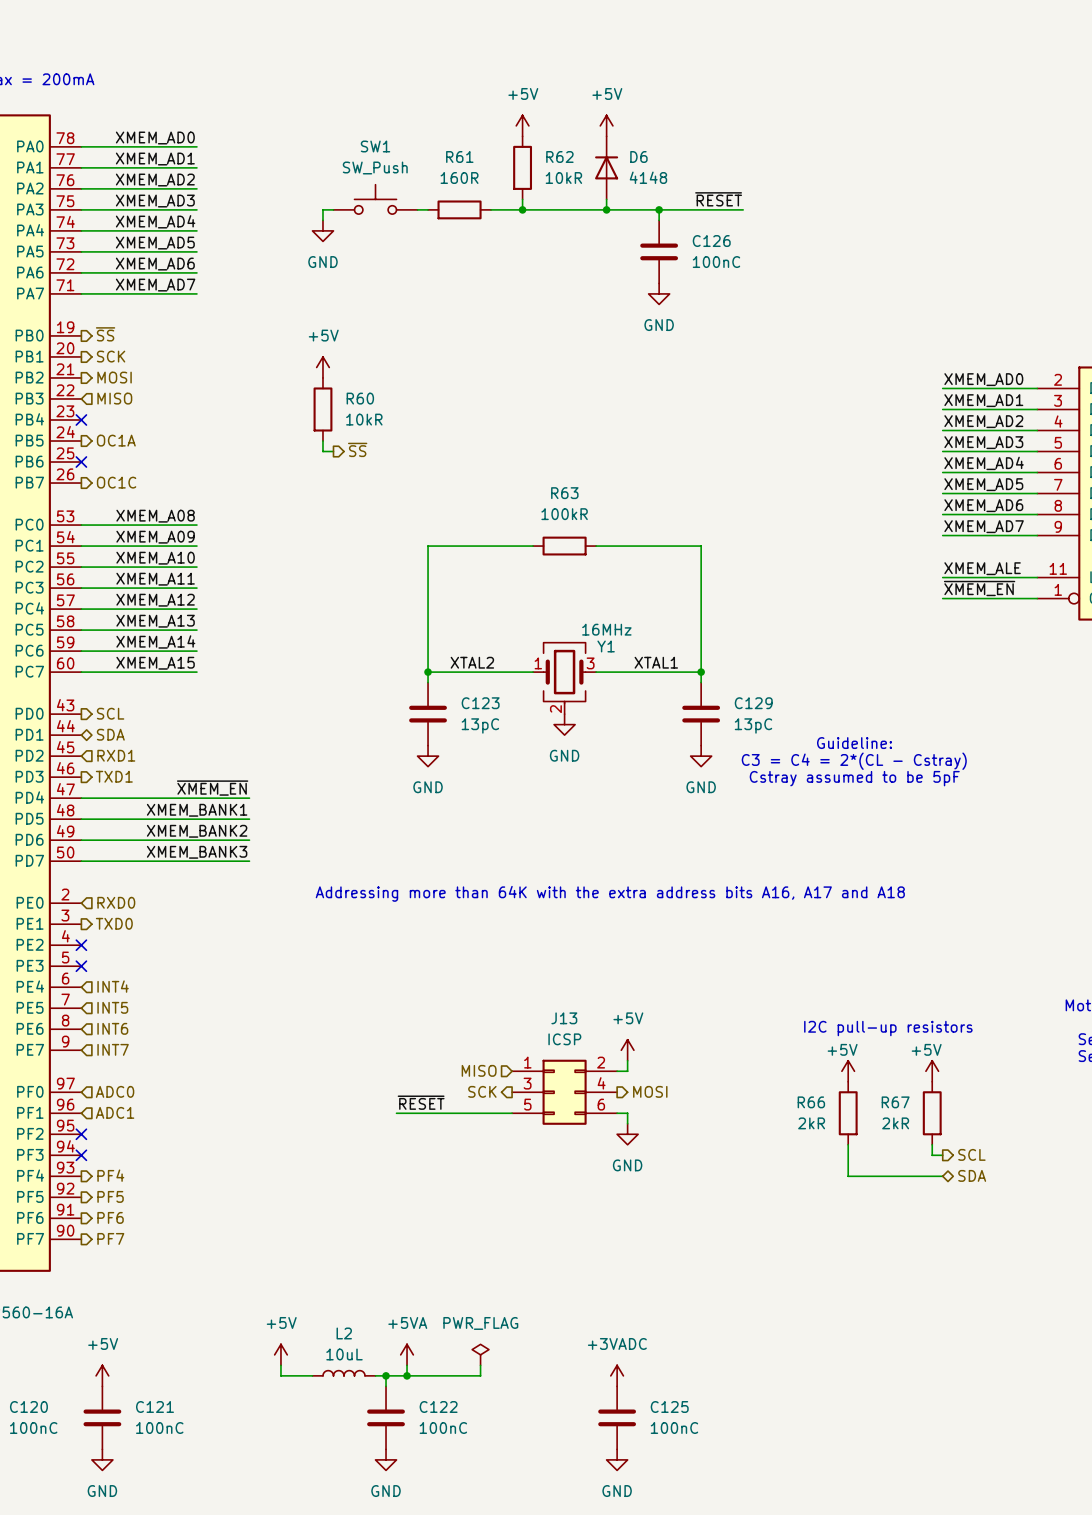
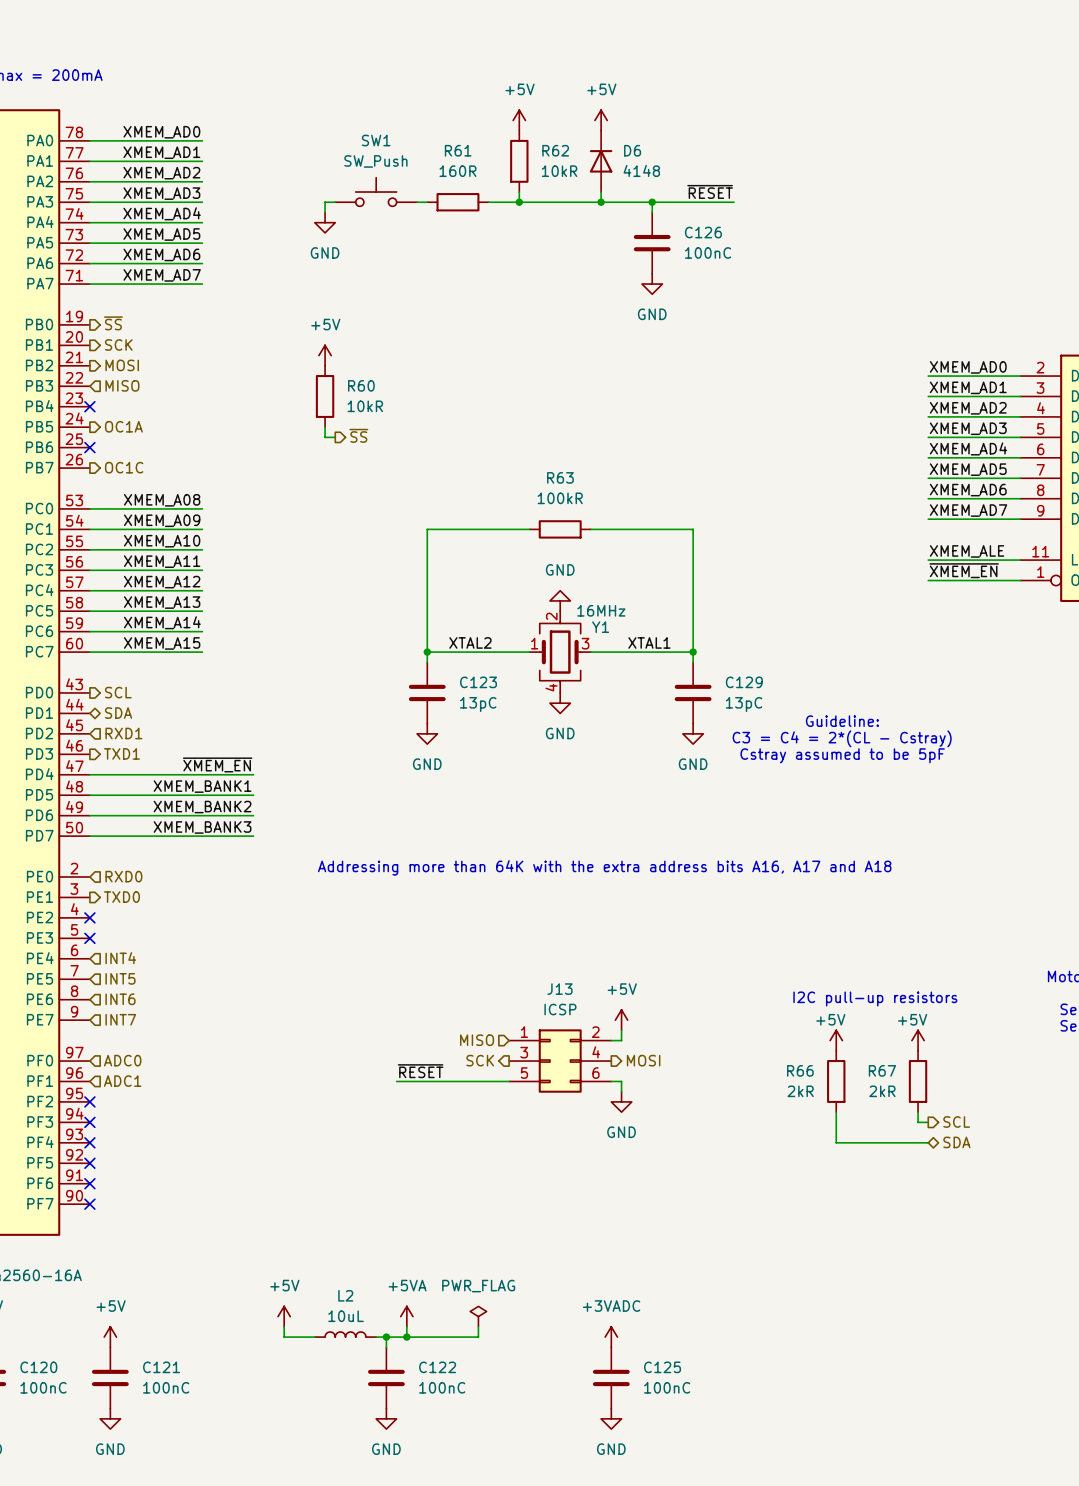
power symbol: none -> GND (560, 600)
Y1 symbol: [533, 642, 597, 715] -> [529, 611, 591, 693]
hierarchical label: PF4 (110, 1175) -> none
no-connect mark: none -> (89, 1142)
hierarchical label: PF5 (110, 1196) -> none
no-connect mark: none -> (89, 1163)
hierarchical label: PF6 (110, 1217) -> none
no-connect mark: none -> (89, 1183)
hierarchical label: PF7 (110, 1238) -> none
no-connect mark: none -> (89, 1204)

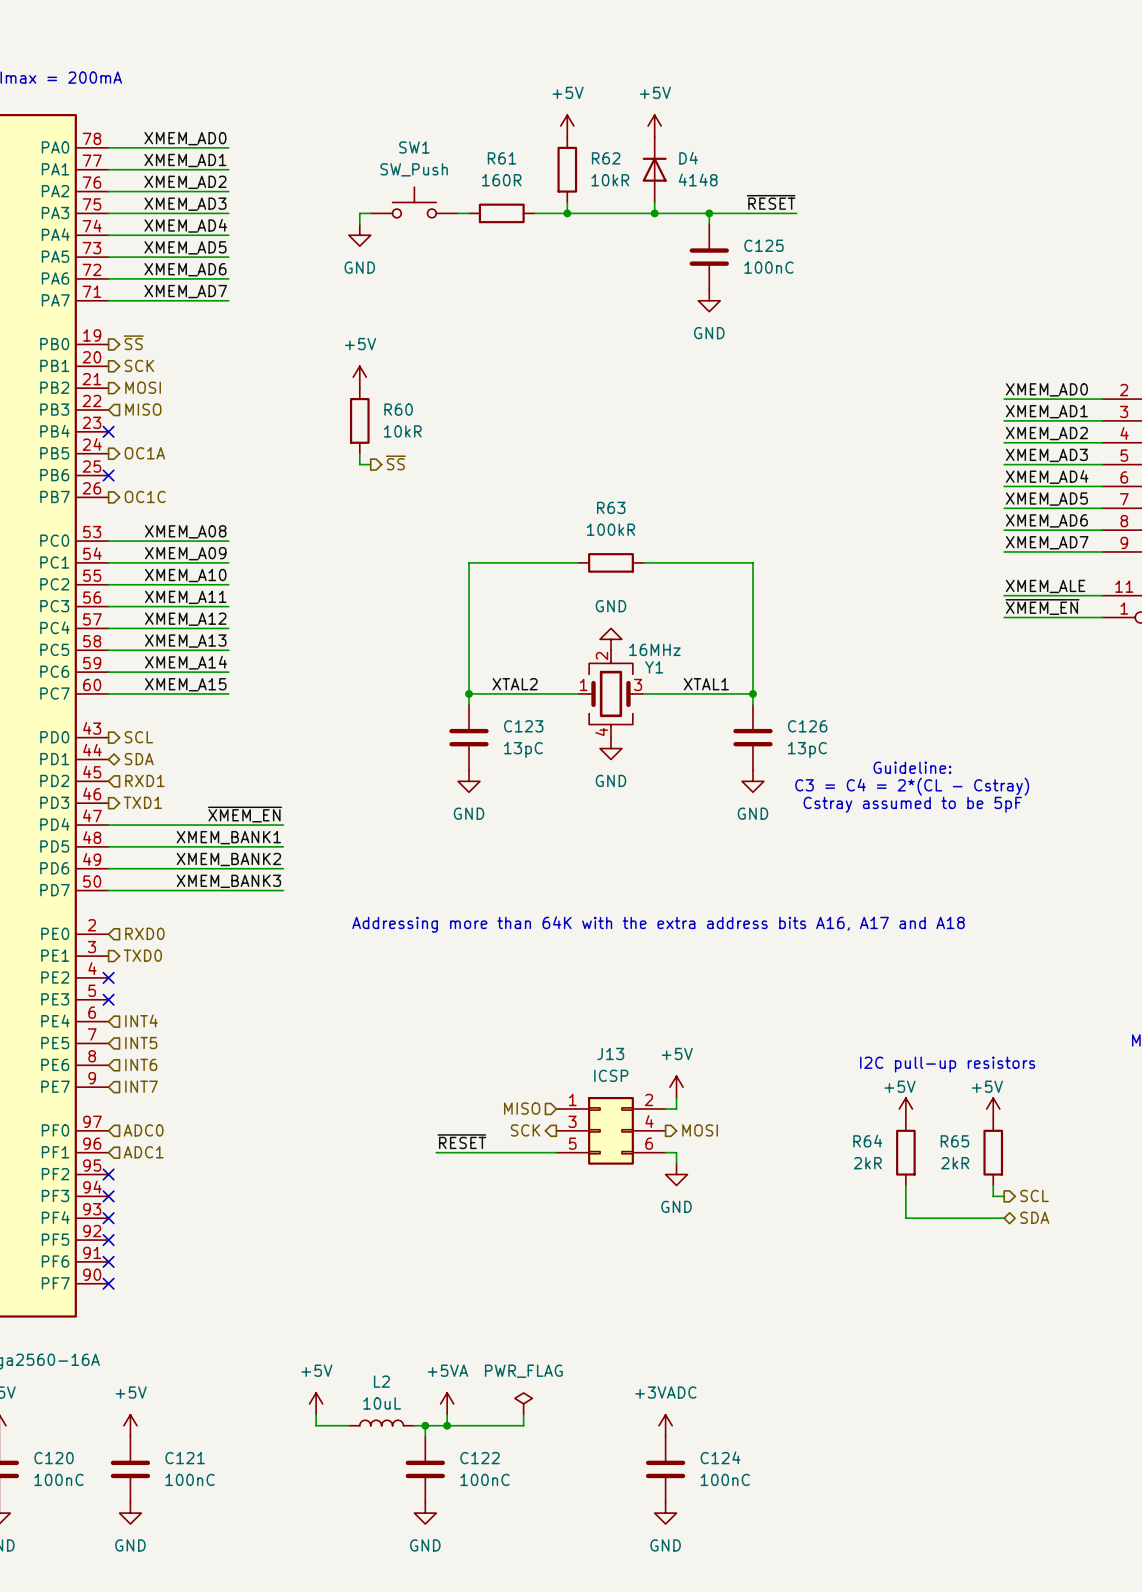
D6 name: D6 (632, 150) -> D4 (688, 158)
C126 name: C126 (703, 232) -> C125 (763, 245)
C129 name: C129 (744, 682) -> C126 (807, 726)
R66 name: R66 (800, 1070) -> R64 (867, 1141)
R67 name: R67 (882, 1070) -> R65 (954, 1141)
C125 name: C125 (662, 1367) -> C124 (720, 1457)

